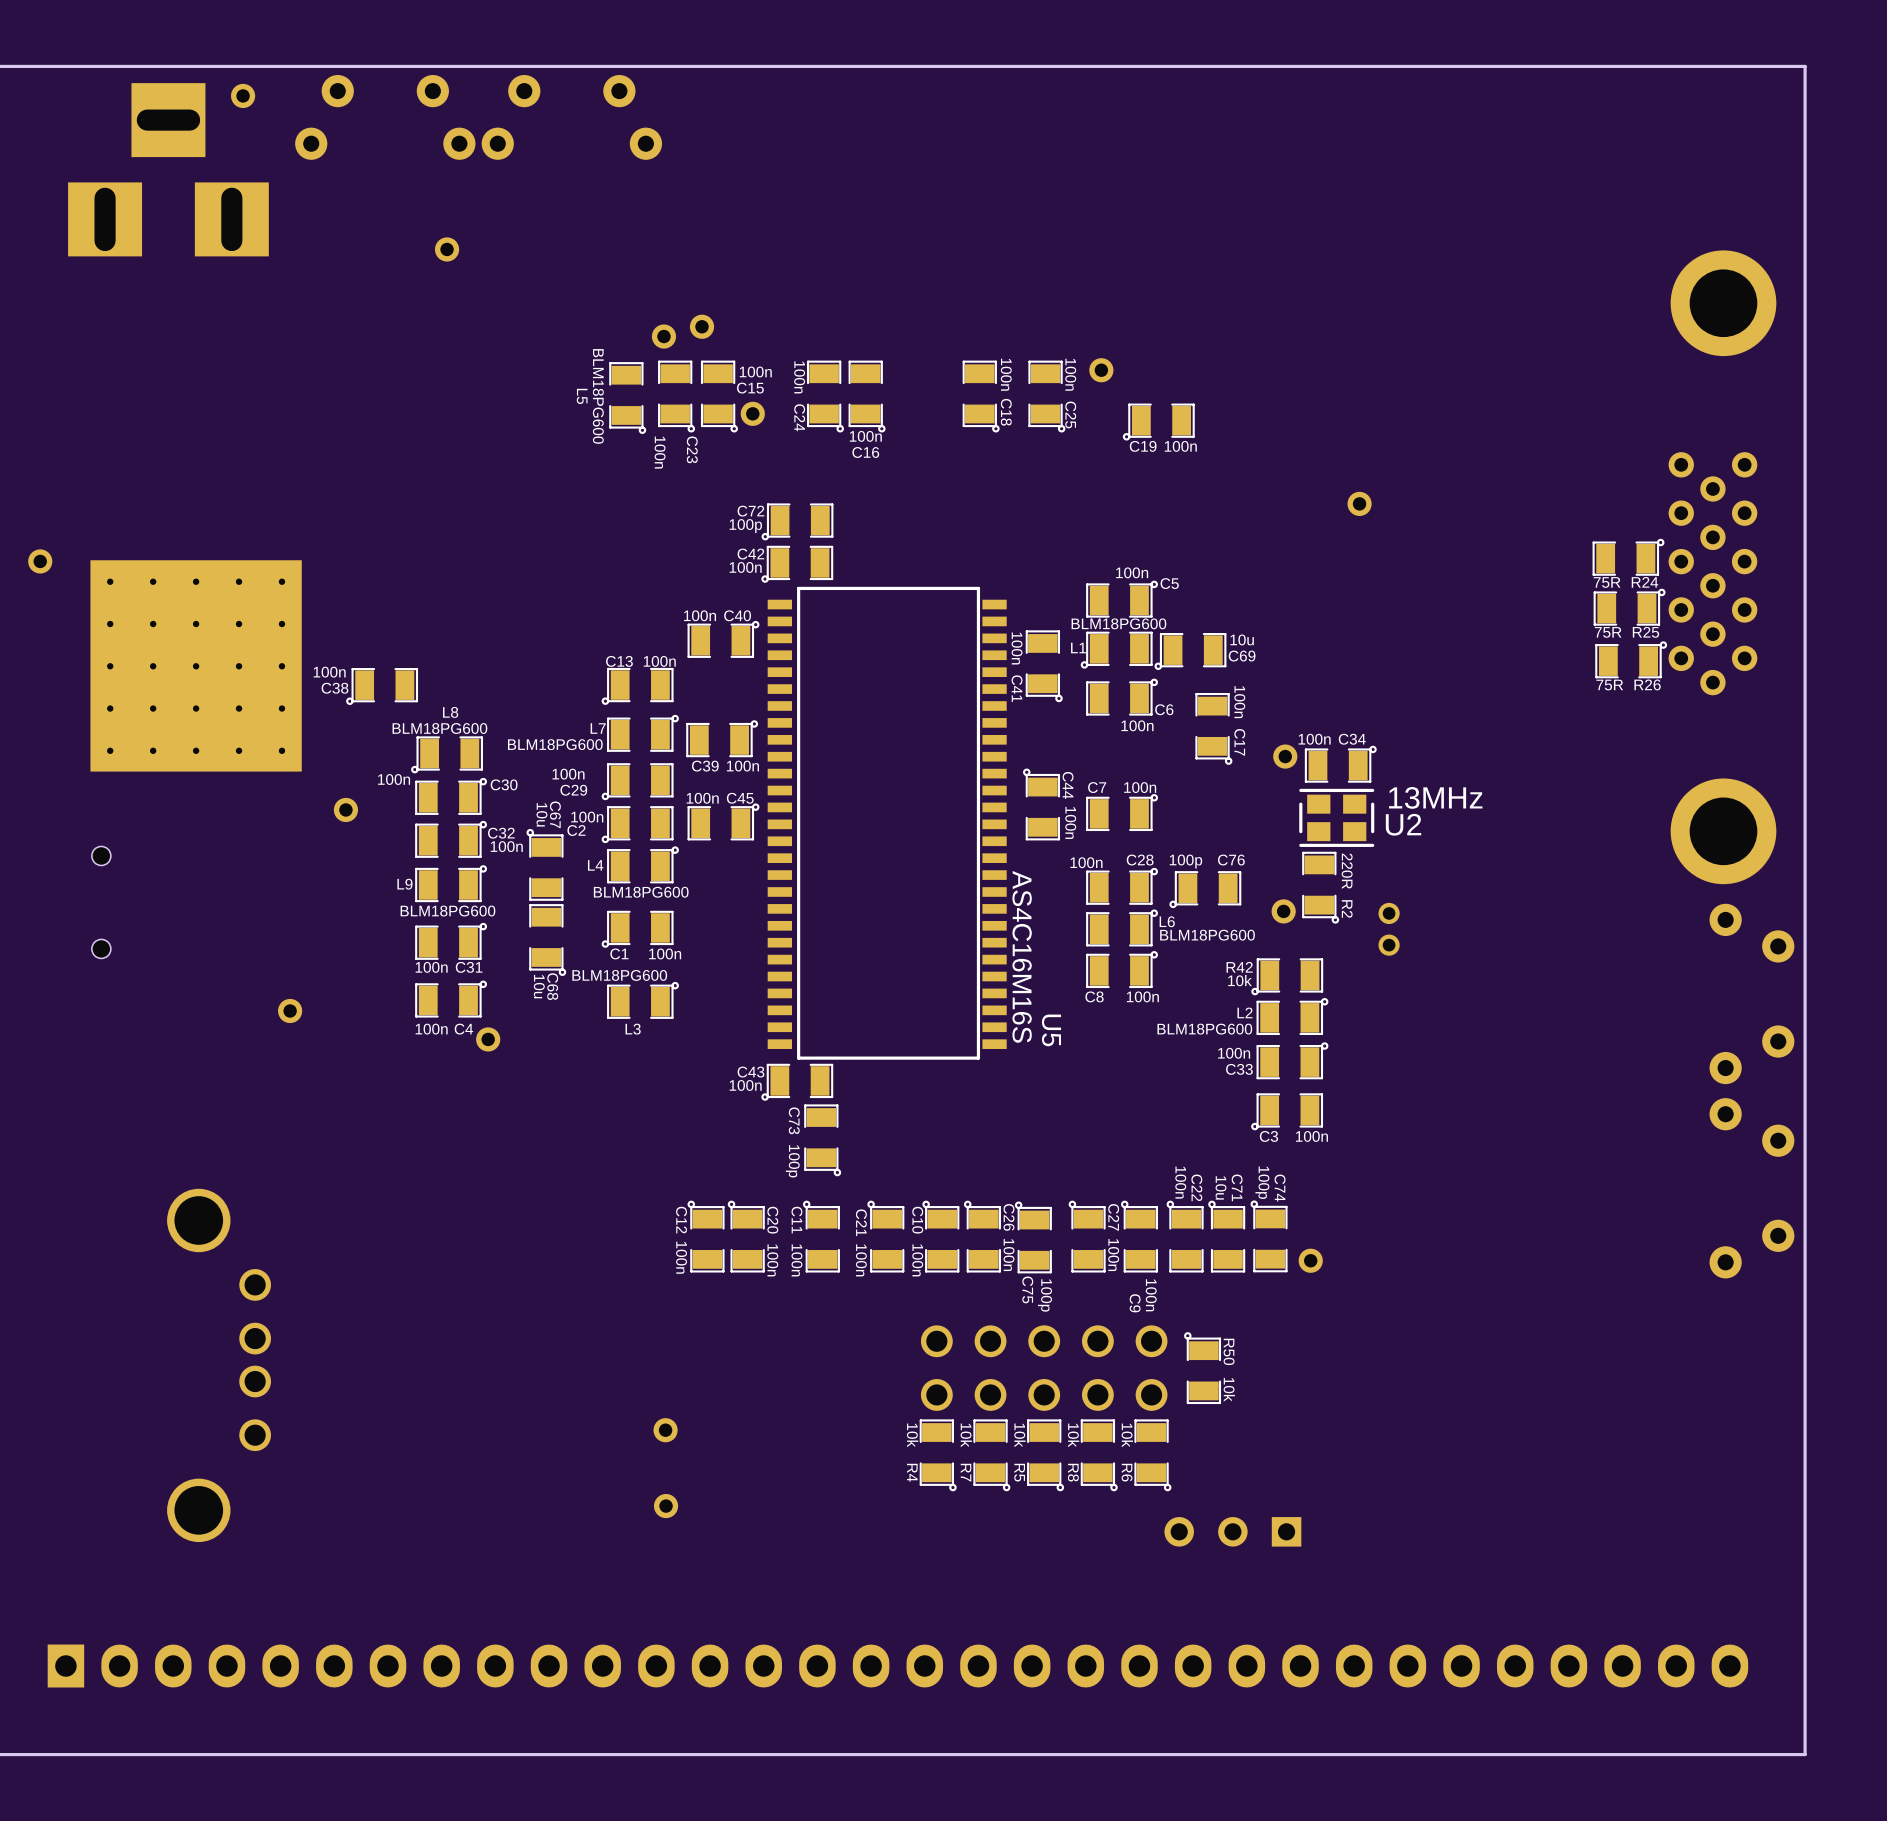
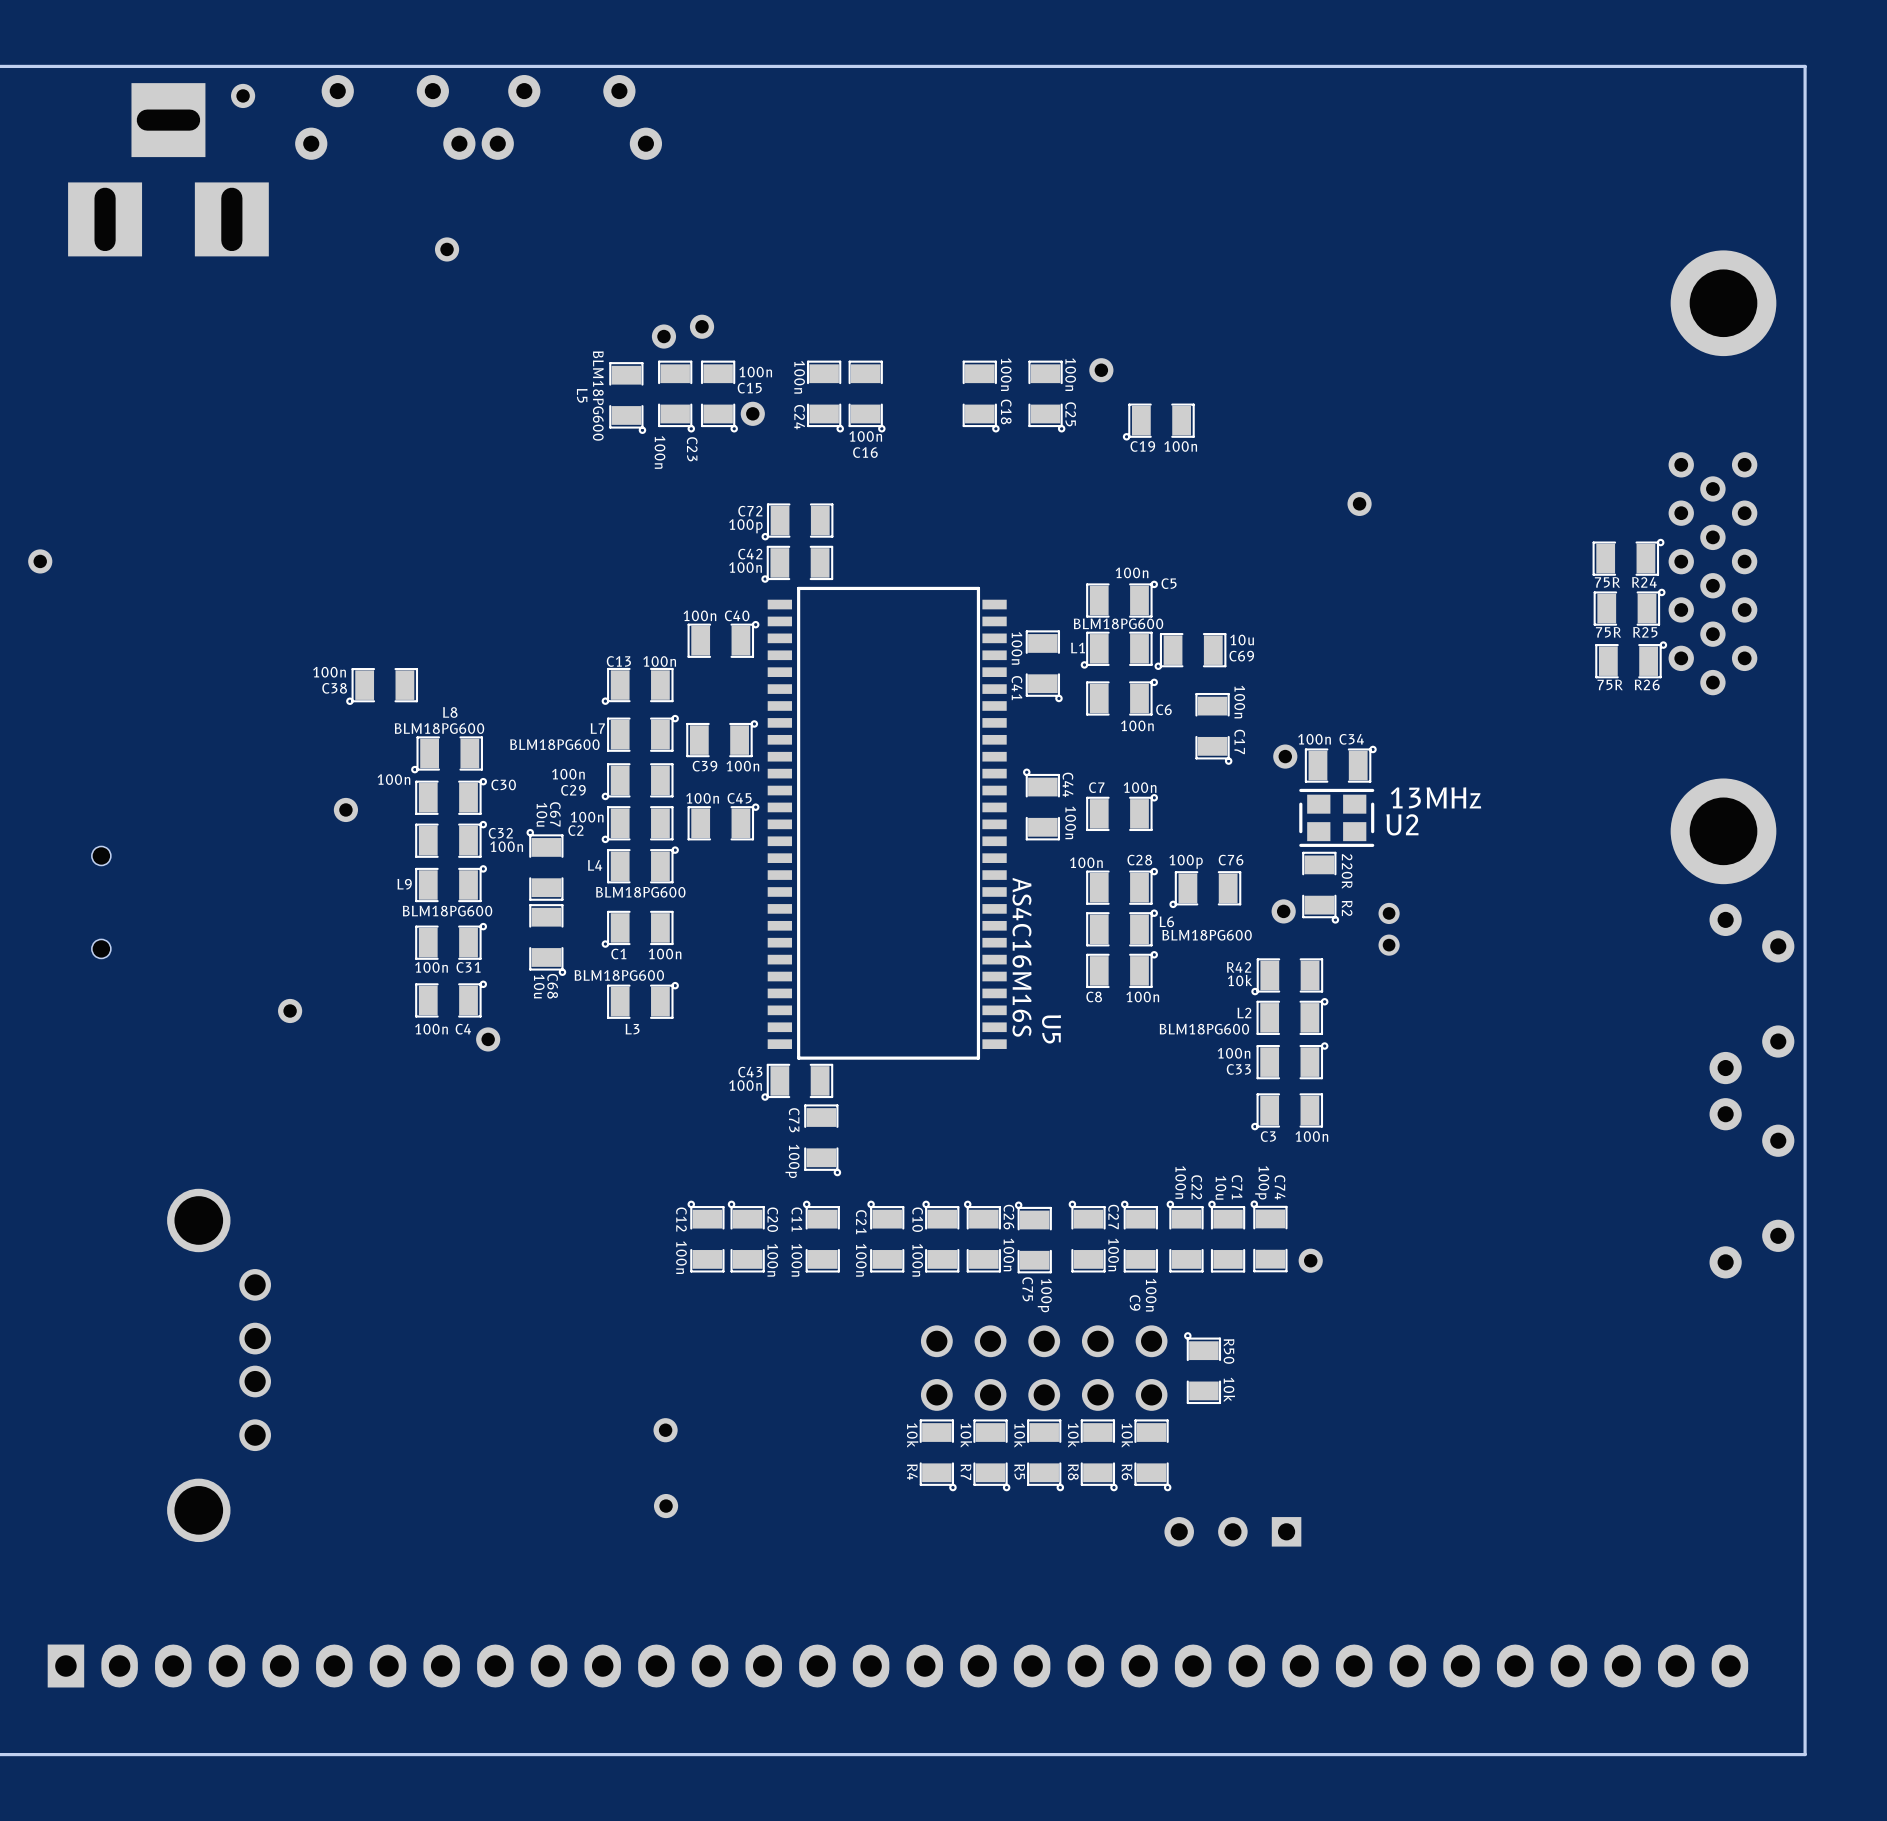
part: (196, 665) -> none

